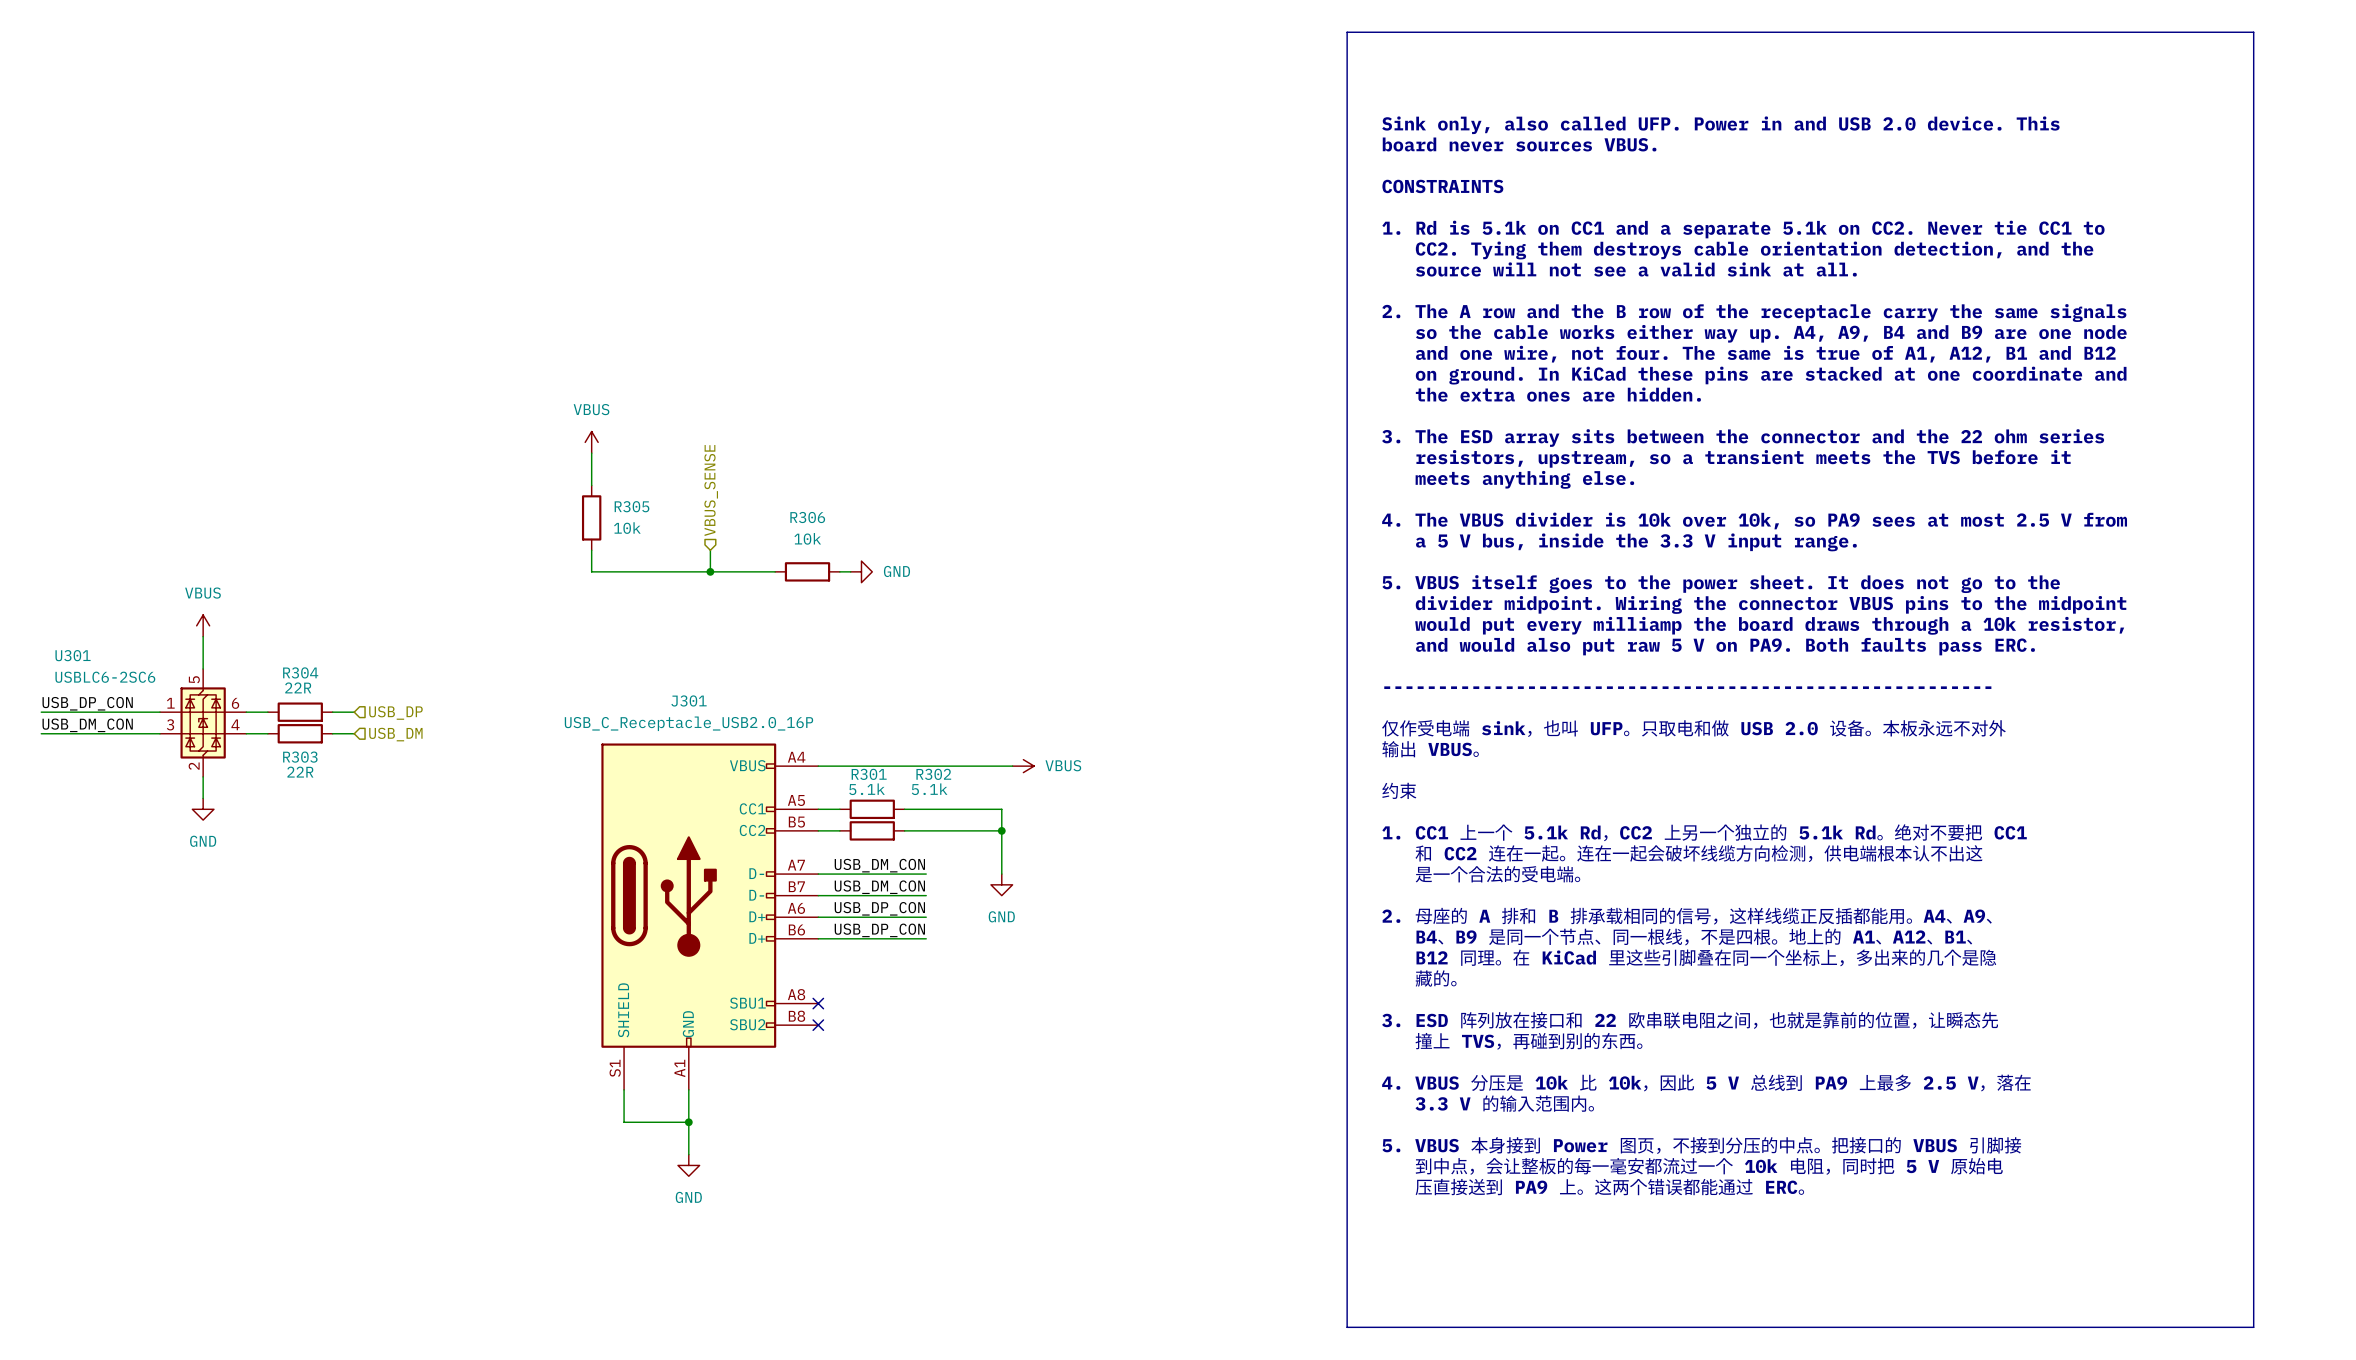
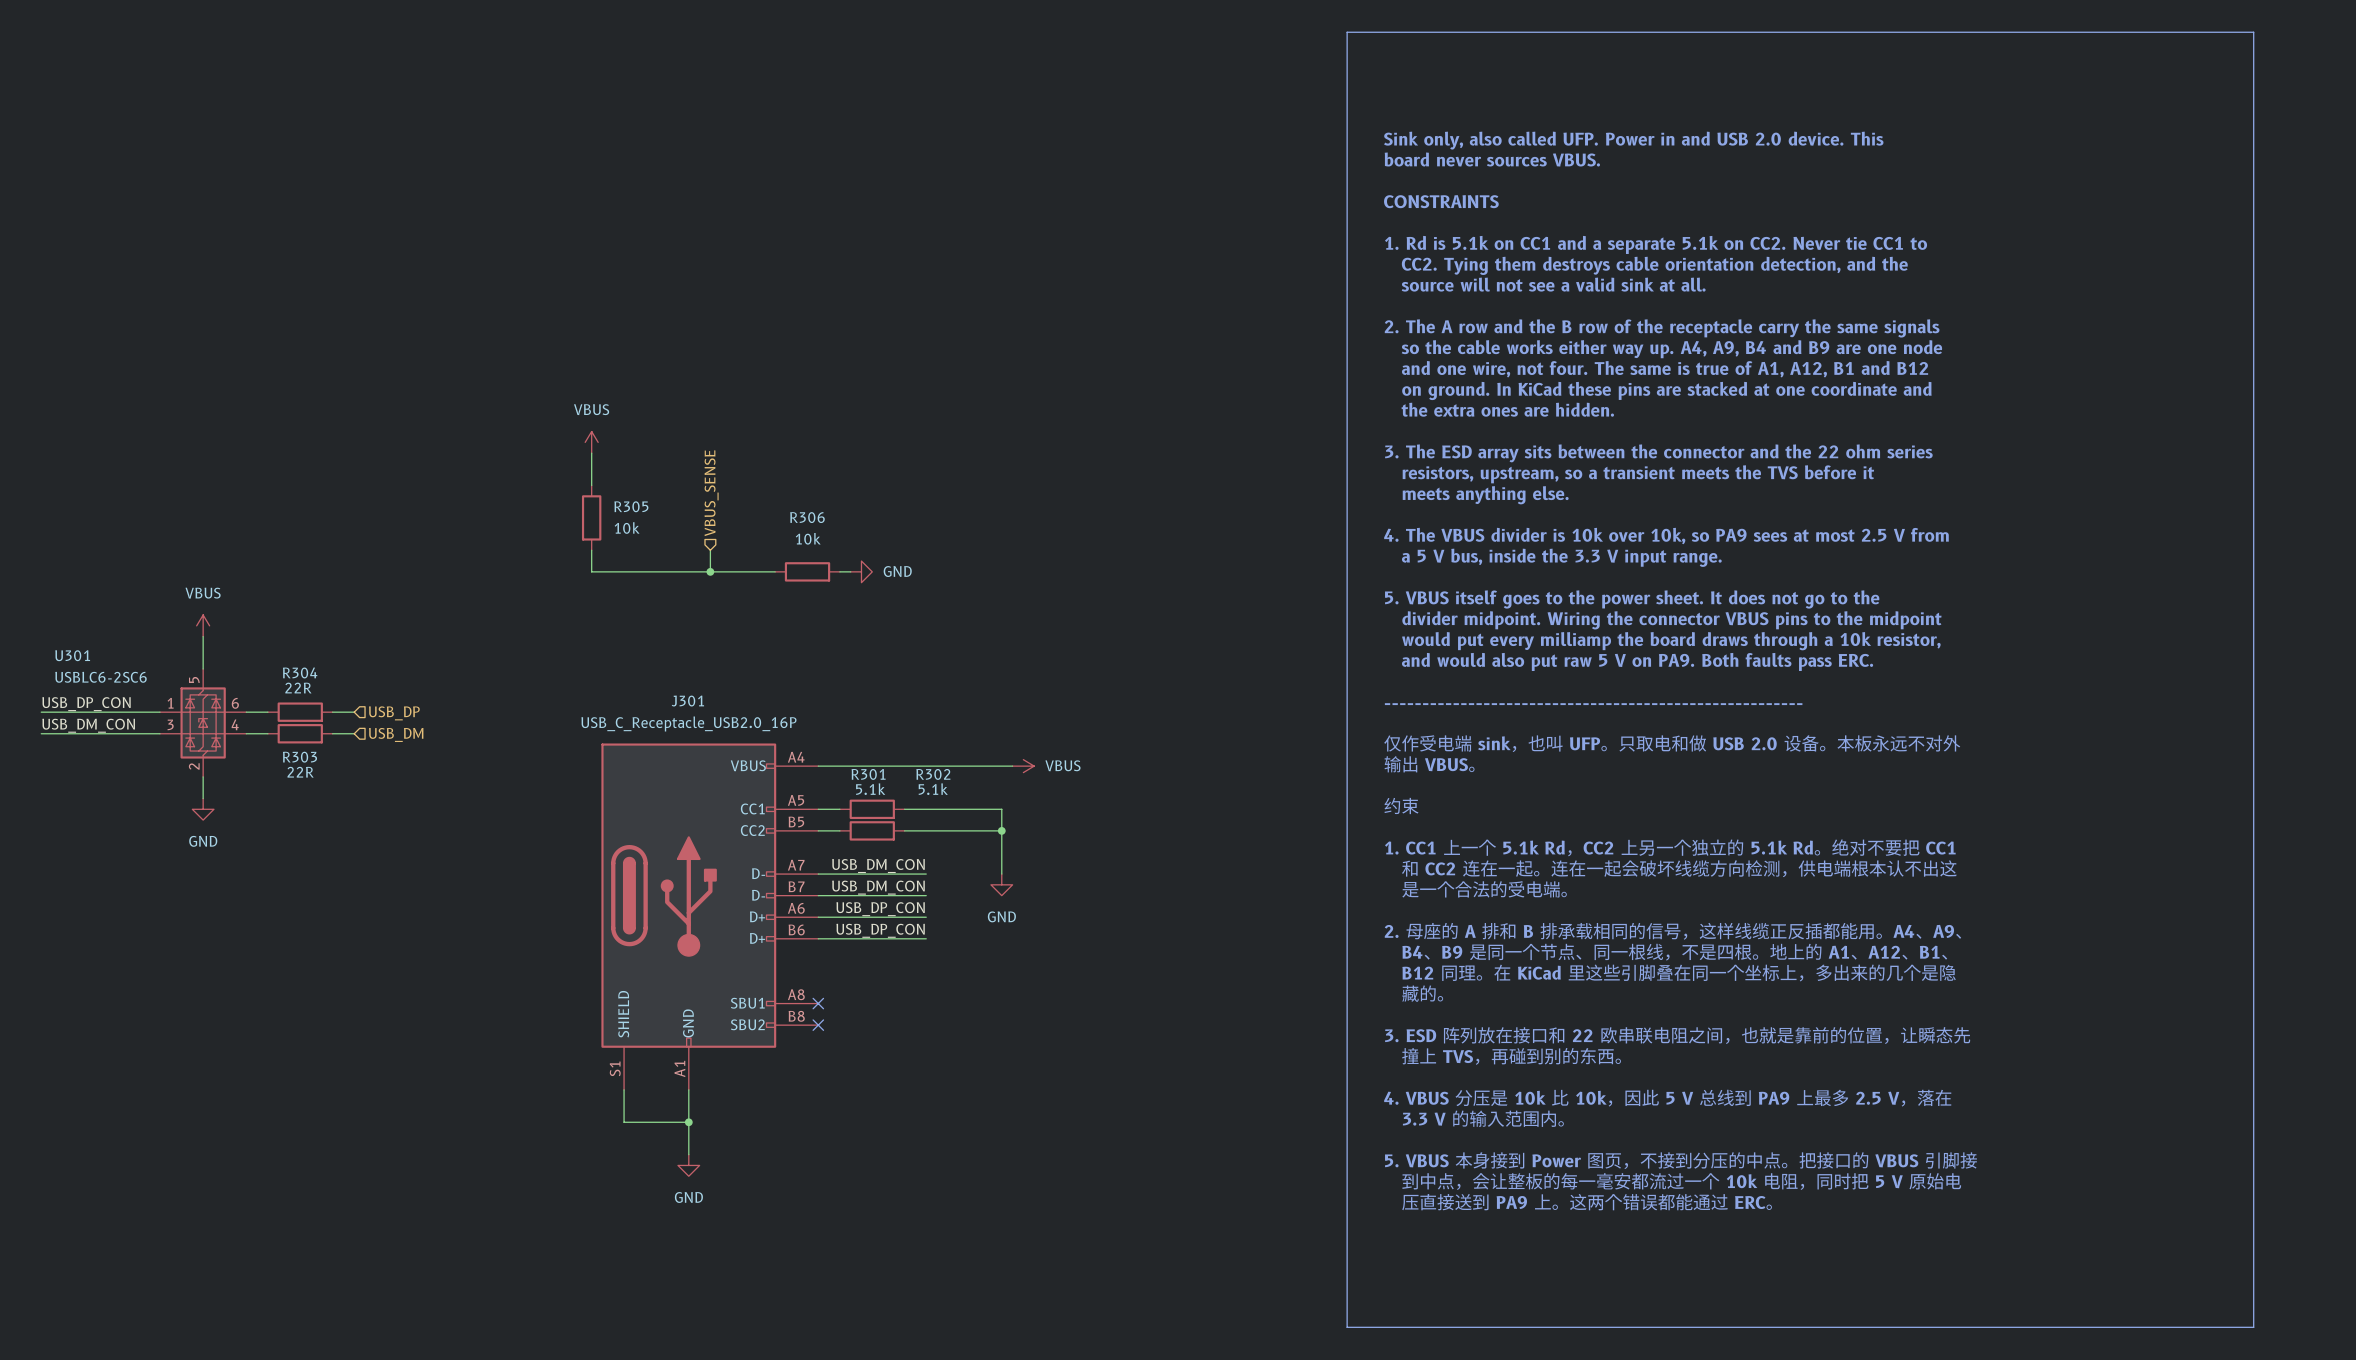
text position: Sink only, also called UFP. Power in and USB 2.0 device. This (1720, 125) -> Sink only, also called UFP. Power in and USB 2.0 device. This (1633, 140)
text position: board never sources VBUS. (1519, 144) -> board never sources VBUS. (1492, 159)
text position: CONSTRAINTS (1442, 186) -> CONSTRAINTS (1441, 201)
text position: 1. Rd is 5.1k on CC1 and a separate 5.1k on CC2. Never tie CC1 to (1743, 229) -> 1. Rd is 5.1k on CC1 and a separate 5.1k on CC2. Never tie CC1 to (1656, 244)
text position: CC2. Tying them destroys cable orientation detection, and the (1754, 250) -> CC2. Tying them destroys cable orientation detection, and the (1654, 265)
text position: source will not see a valid sink at all. (1636, 269) -> source will not see a valid sink at all. (1553, 284)
text position: 2. The A row and the B row of the receptacle carry the same signals (1754, 313) -> 2. The A row and the B row of the receptacle carry the same signals (1662, 328)
text position: so the cable works either way up. A4, A9, B4 and B9 are one node (1771, 333) -> so the cable works either way up. A4, A9, B4 and B9 are one node (1671, 349)
text position: and one wire, not four. The same is true of A1, A12, B1 and B12 (1765, 354) -> and one wire, not four. The same is true of A1, A12, B1 and B12 (1665, 369)
text position: on ground. In KiCad these pins are stacked at one coordinate and (1771, 375) -> on ground. In KiCad these pins are stacked at one coordinate and (1666, 390)
text position: the extra ones are hidden. (1558, 394) -> the extra ones are hidden. (1507, 409)
text position: 3. The ESD array sits between the connector and the 22 ohm series (1743, 438) -> 3. The ESD array sits between the connector and the 22 ohm series (1658, 453)
text position: resistors, upstream, so a transient meets the TVS before it (1743, 458) -> resistors, upstream, so a transient meets the TVS before it (1638, 474)
text position: meets anything else. (1524, 479) -> meets anything else. (1485, 495)
text position: 4. The VBUS divider is 10k over 10k, so PA9 sees at most 2.5 V from (1754, 520) -> 4. The VBUS divider is 10k over 10k, so PA9 sees at most 2.5 V from (1666, 536)
text position: a 5 V bus, inside the 3.3 V input range. (1636, 542) -> a 5 V bus, inside the 3.3 V input range. (1561, 557)
text position: 5. VBUS itself goes to the power sheet. It does not go to the (1721, 584) -> 5. VBUS itself goes to the power sheet. It does not go to the (1632, 599)
text position: divider midpoint. Wiring the connector VBUS pins to the midpoint (1771, 604) -> divider midpoint. Wiring the connector VBUS pins to the midpoint (1671, 620)
text position: would put every milliamp the board draws through a 10k resistor, (1769, 625) -> would put every milliamp the board draws through a 10k resistor, (1671, 641)
text position: and would also put raw 5 V on PA9. Both faults pass ERC. (1725, 646) -> and would also put raw 5 V on PA9. Both faults pass ERC. (1637, 661)
text position: ------------------------------------------------------- (1687, 687) -> ------------------------------------------------------- (1593, 704)
text position: 仅作受电端 sink，也叫 UFP。只取电和做 USB 2.0 设备。本板永远不对外 (1693, 728) -> 仅作受电端 sink，也叫 UFP。只取电和做 USB 2.0 设备。本板永远不对外 (1672, 743)
text position: 输出 VBUS。 (1430, 749) -> 输出 VBUS。 (1429, 764)
text position: 约束 (1399, 790) -> 约束 (1401, 806)
text position: 1. CC1 上一个 5.1k Rd，CC2 上另一个独立的 5.1k Rd。绝对不要把 CC1 (1704, 832) -> 1. CC1 上一个 5.1k Rd，CC2 上另一个独立的 5.1k Rd。绝对不要把 CC1 (1670, 847)
text position: 和 CC2 连在一起。连在一起会破坏线缆方向检测，供电端根本认不出这 (1698, 853) -> 和 CC2 连在一起。连在一起会破坏线缆方向检测，供电端根本认不出这 (1679, 868)
text position: 是一个合法的受电端。 (1497, 874) -> 是一个合法的受电端。 (1484, 889)
text position: 2. 母座的 A 排和 B 排承载相同的信号，这样线缆正反插都能用。A4、A9、 (1687, 916) -> 2. 母座的 A 排和 B 排承载相同的信号，这样线缆正反插都能用。A4、A9、 (1672, 931)
text position: B4、B9 是同一个节点、同一根线，不是四根。地上的 A1、A12、B1、 (1694, 937) -> B4、B9 是同一个节点、同一根线，不是四根。地上的 A1、A12、B1、 (1674, 952)
text position: B12 同理。在 KiCad 里这些引脚叠在同一个坐标上，多出来的几个是隐 (1706, 957) -> B12 同理。在 KiCad 里这些引脚叠在同一个坐标上，多出来的几个是隐 (1679, 972)
text position: 藏的。 (1436, 978) -> 藏的。 (1422, 993)
text position: 3. ESD 阵列放在接口和 22 欧串联电阻之间，也就是靠前的位置，让瞬态先 (1690, 1020) -> 3. ESD 阵列放在接口和 22 欧串联电阻之间，也就是靠前的位置，让瞬态先 (1677, 1035)
text position: 撞上 TVS，再碰到别的东西。 (1528, 1041) -> 撞上 TVS，再碰到别的东西。 (1511, 1056)
text position: 4. VBUS 分压是 10k 比 10k，因此 5 V 总线到 PA9 上最多 2.5 V，落在 (1706, 1083) -> 4. VBUS 分压是 10k 比 10k，因此 5 V 总线到 PA9 上最多 2.5 V，落在 (1667, 1098)
text position: 3.3 V 的输入范围内。 (1504, 1103) -> 3.3 V 的输入范围内。 (1483, 1118)
text position: 5. VBUS 本身接到 Power 图页，不接到分压的中点。把接口的 VBUS 引脚接 (1701, 1145) -> 5. VBUS 本身接到 Power 图页，不接到分压的中点。把接口的 VBUS 引脚接 (1680, 1160)
text position: 到中点，会让整板的每一毫安都流过一个 10k 电阻，同时把 5 V 原始电 (1709, 1166) -> 到中点，会让整板的每一毫安都流过一个 10k 电阻，同时把 5 V 原始电 (1681, 1181)
text position: 压直接送到 PA9 上。这两个错误都能通过 ERC。 (1609, 1187) -> 压直接送到 PA9 上。这两个错误都能通过 ERC。 (1587, 1202)

